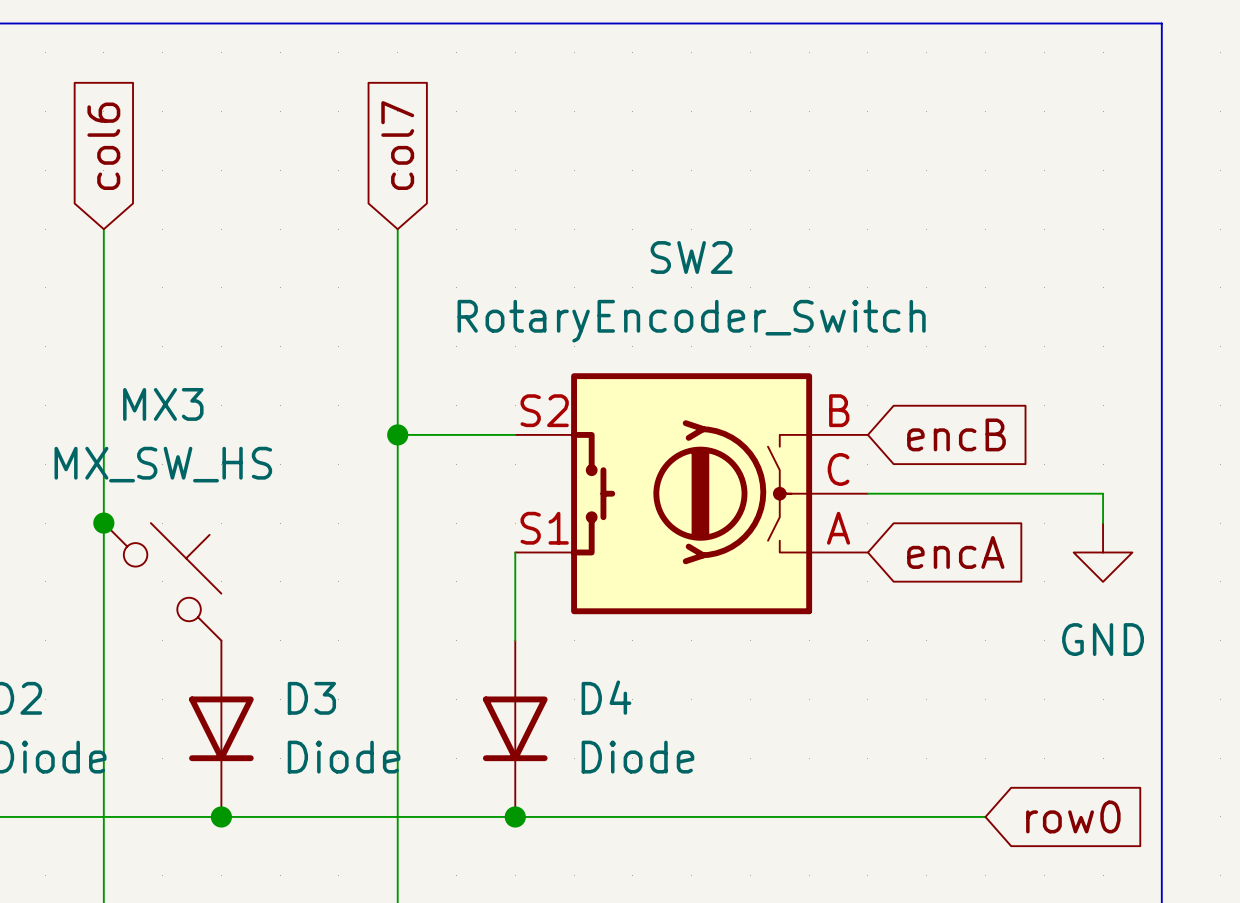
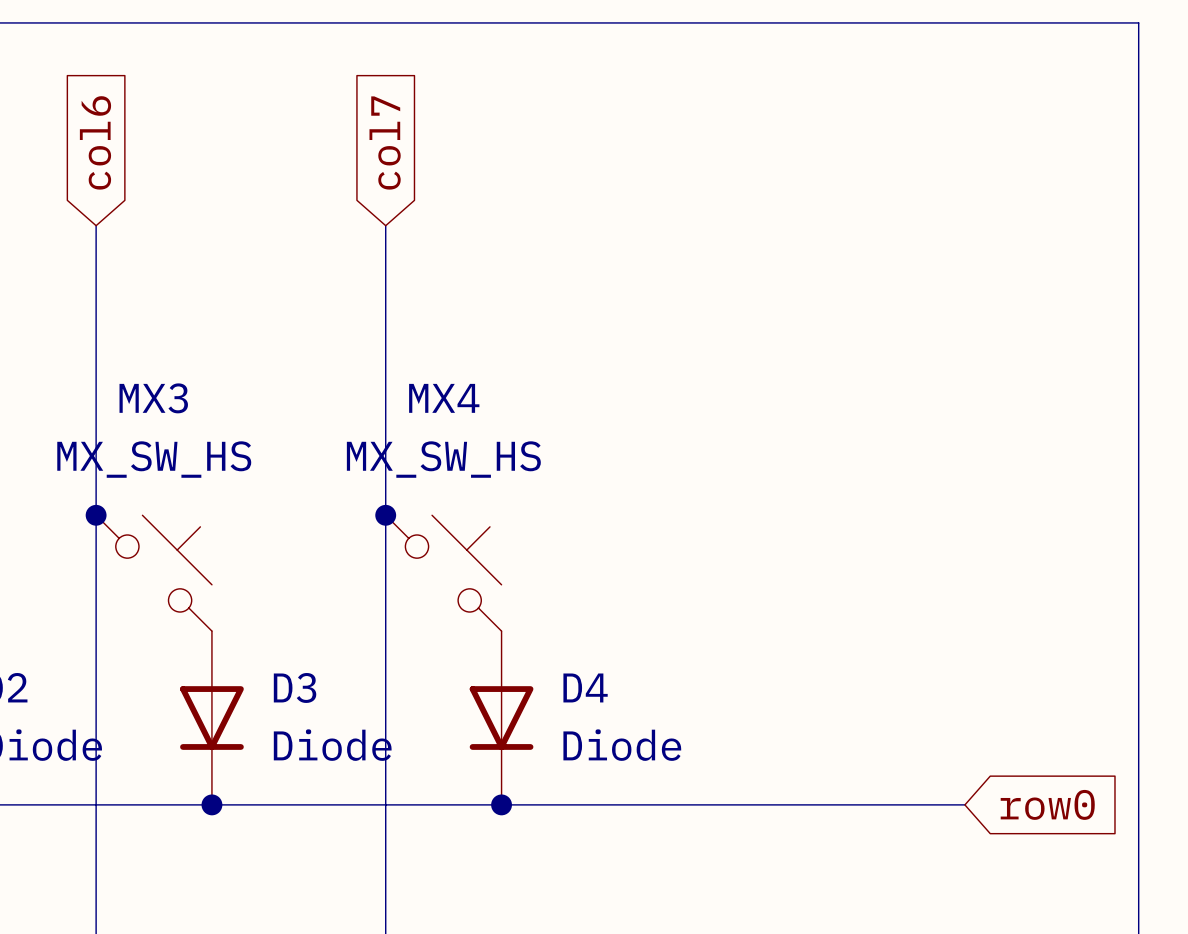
wire: (397, 434) (515, 434) -> none
junction position: (397, 434) -> (385, 515)
global label: encB (956, 434) -> none
SW2: RotaryEncoder_Switch (691, 493) -> none
wire: (867, 493) (1103, 493) (1103, 523) -> none
wire: (515, 552) (515, 640) -> none
global label: encA (955, 552) -> none
power symbol: GND (1103, 552) -> none
MX4: none -> MX_SW_HS (443, 573)

